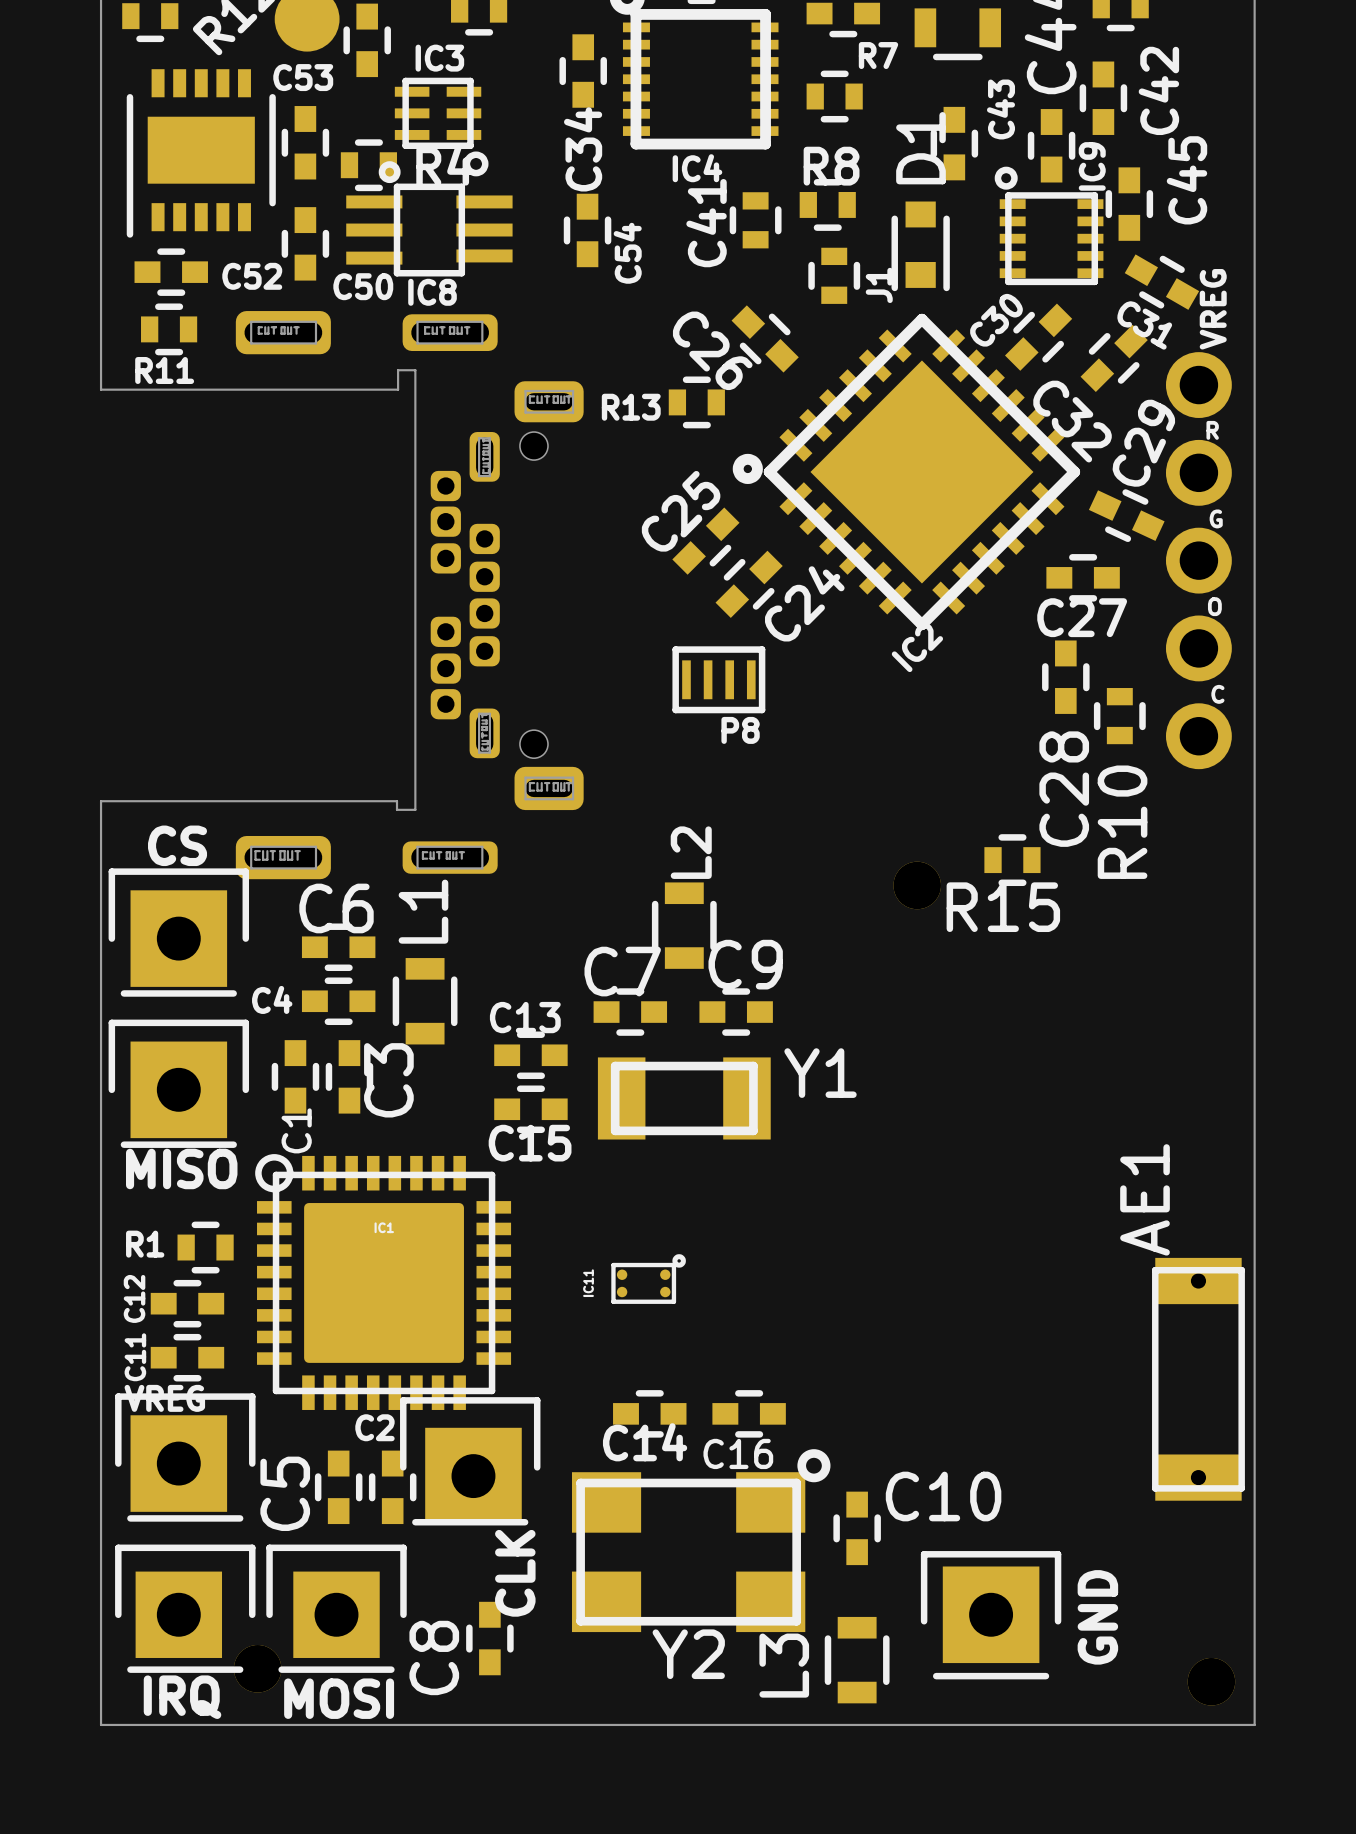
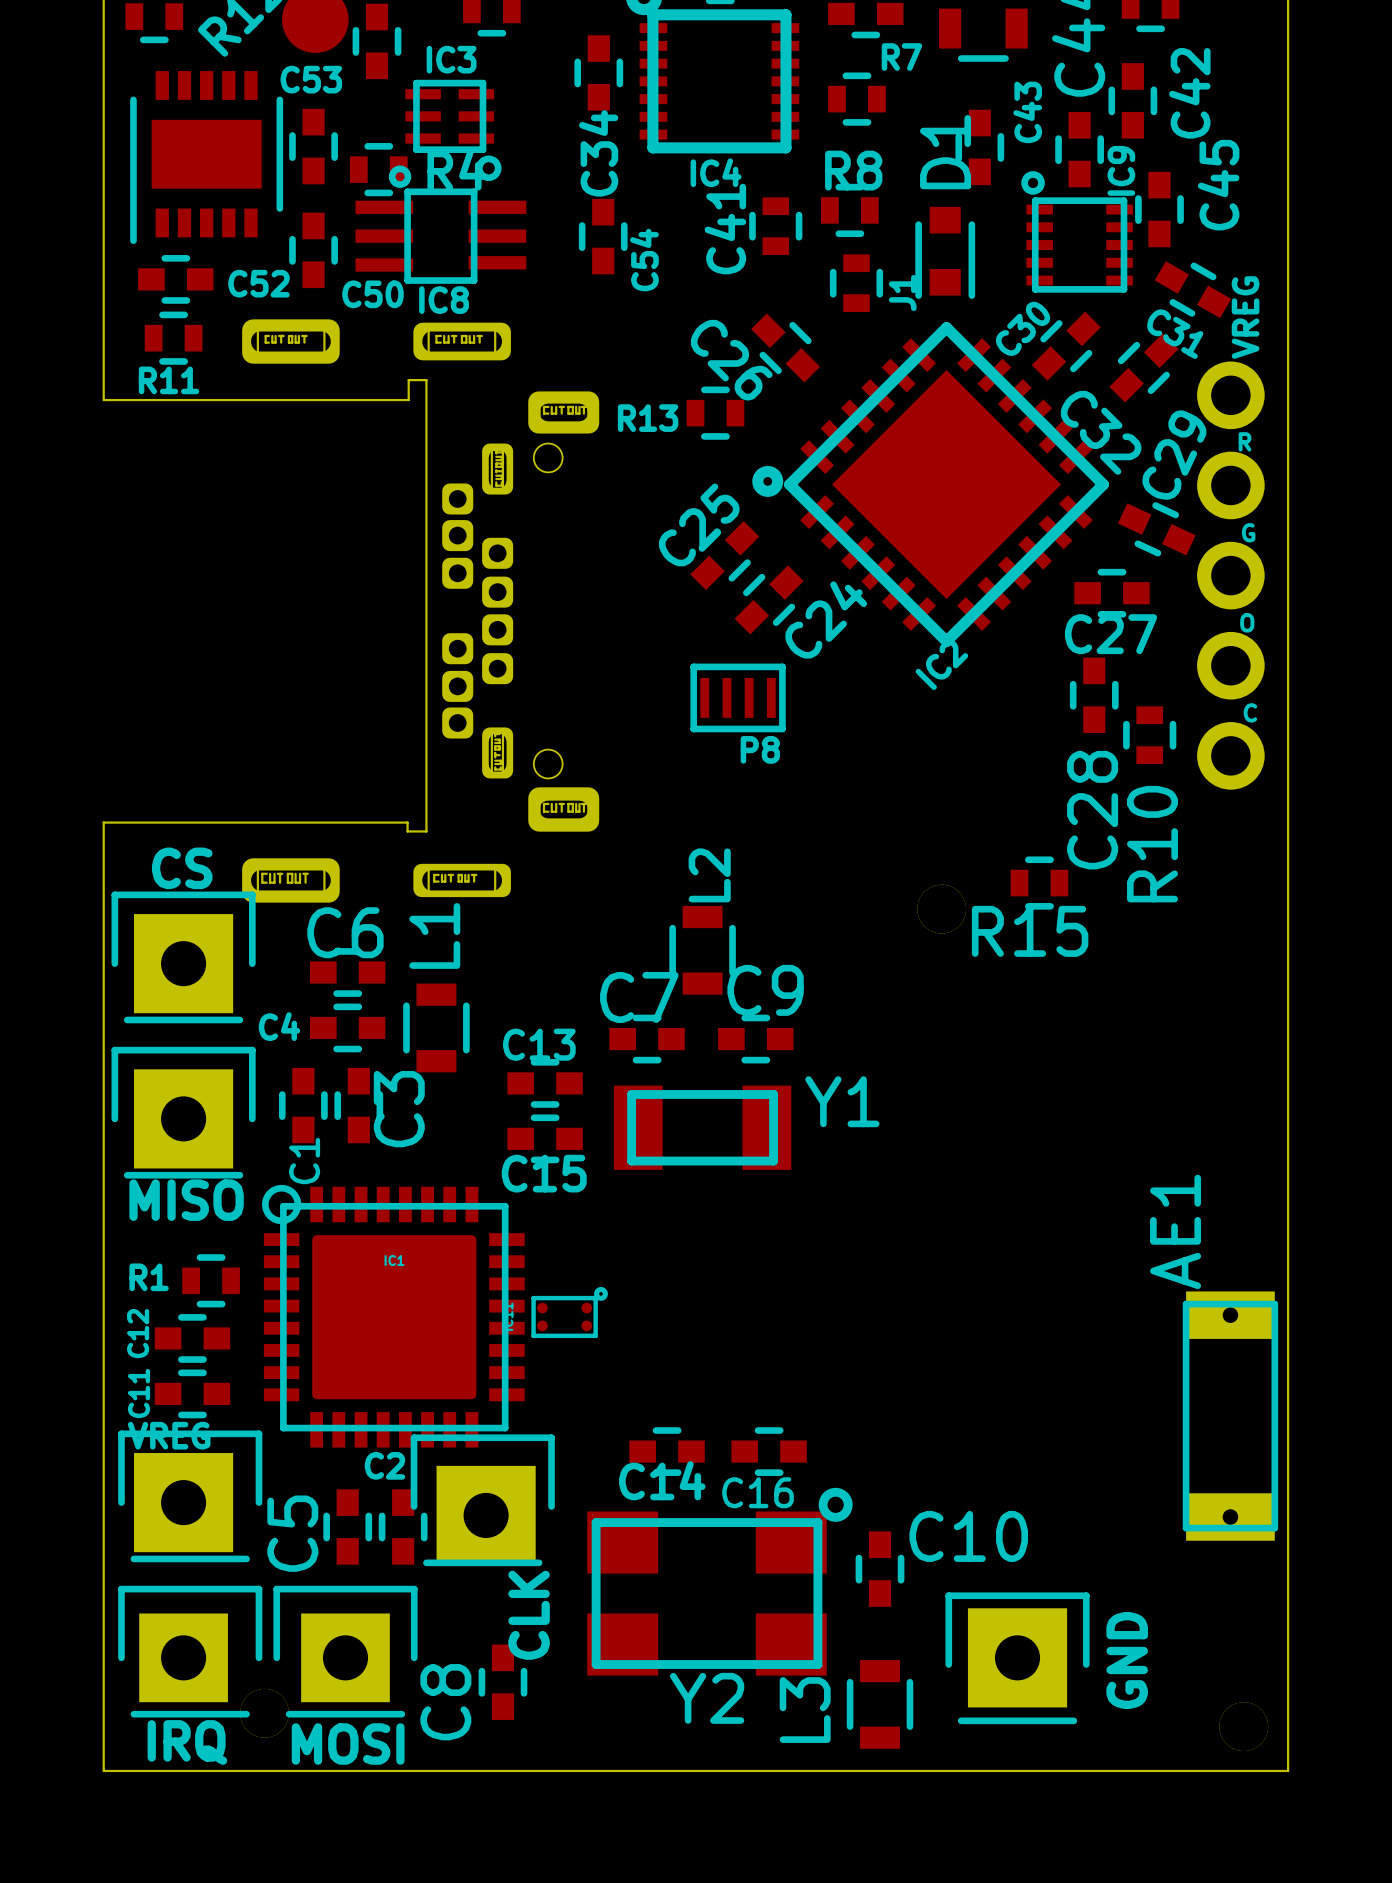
IC11 position: (648, 1279) -> (569, 1312)

